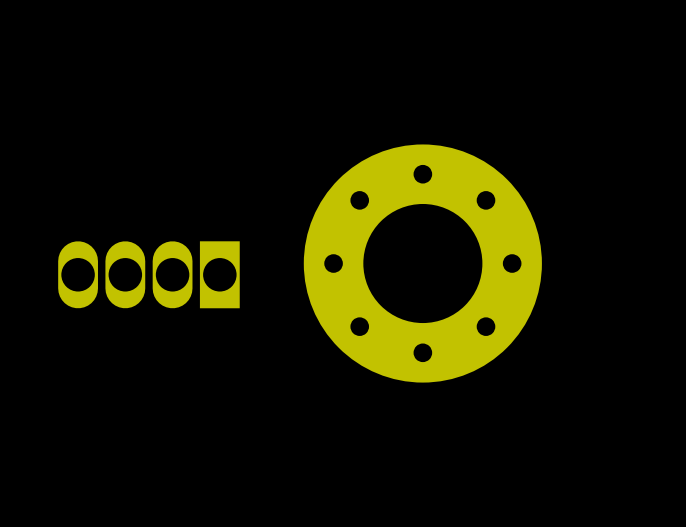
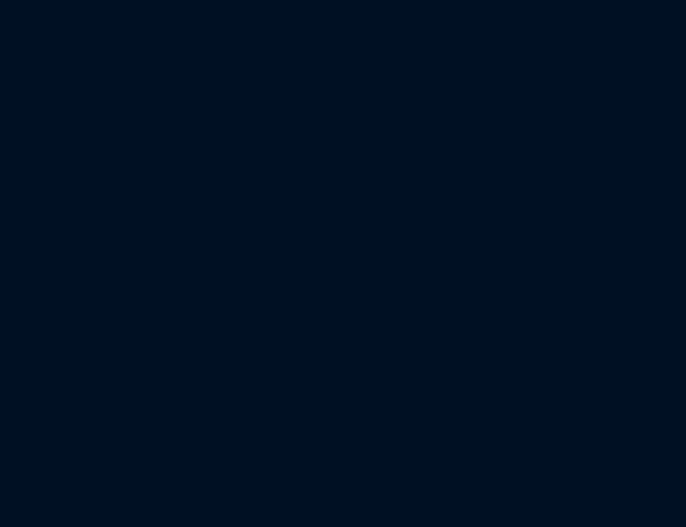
part: (422, 263) -> none
part: (148, 274) -> none

